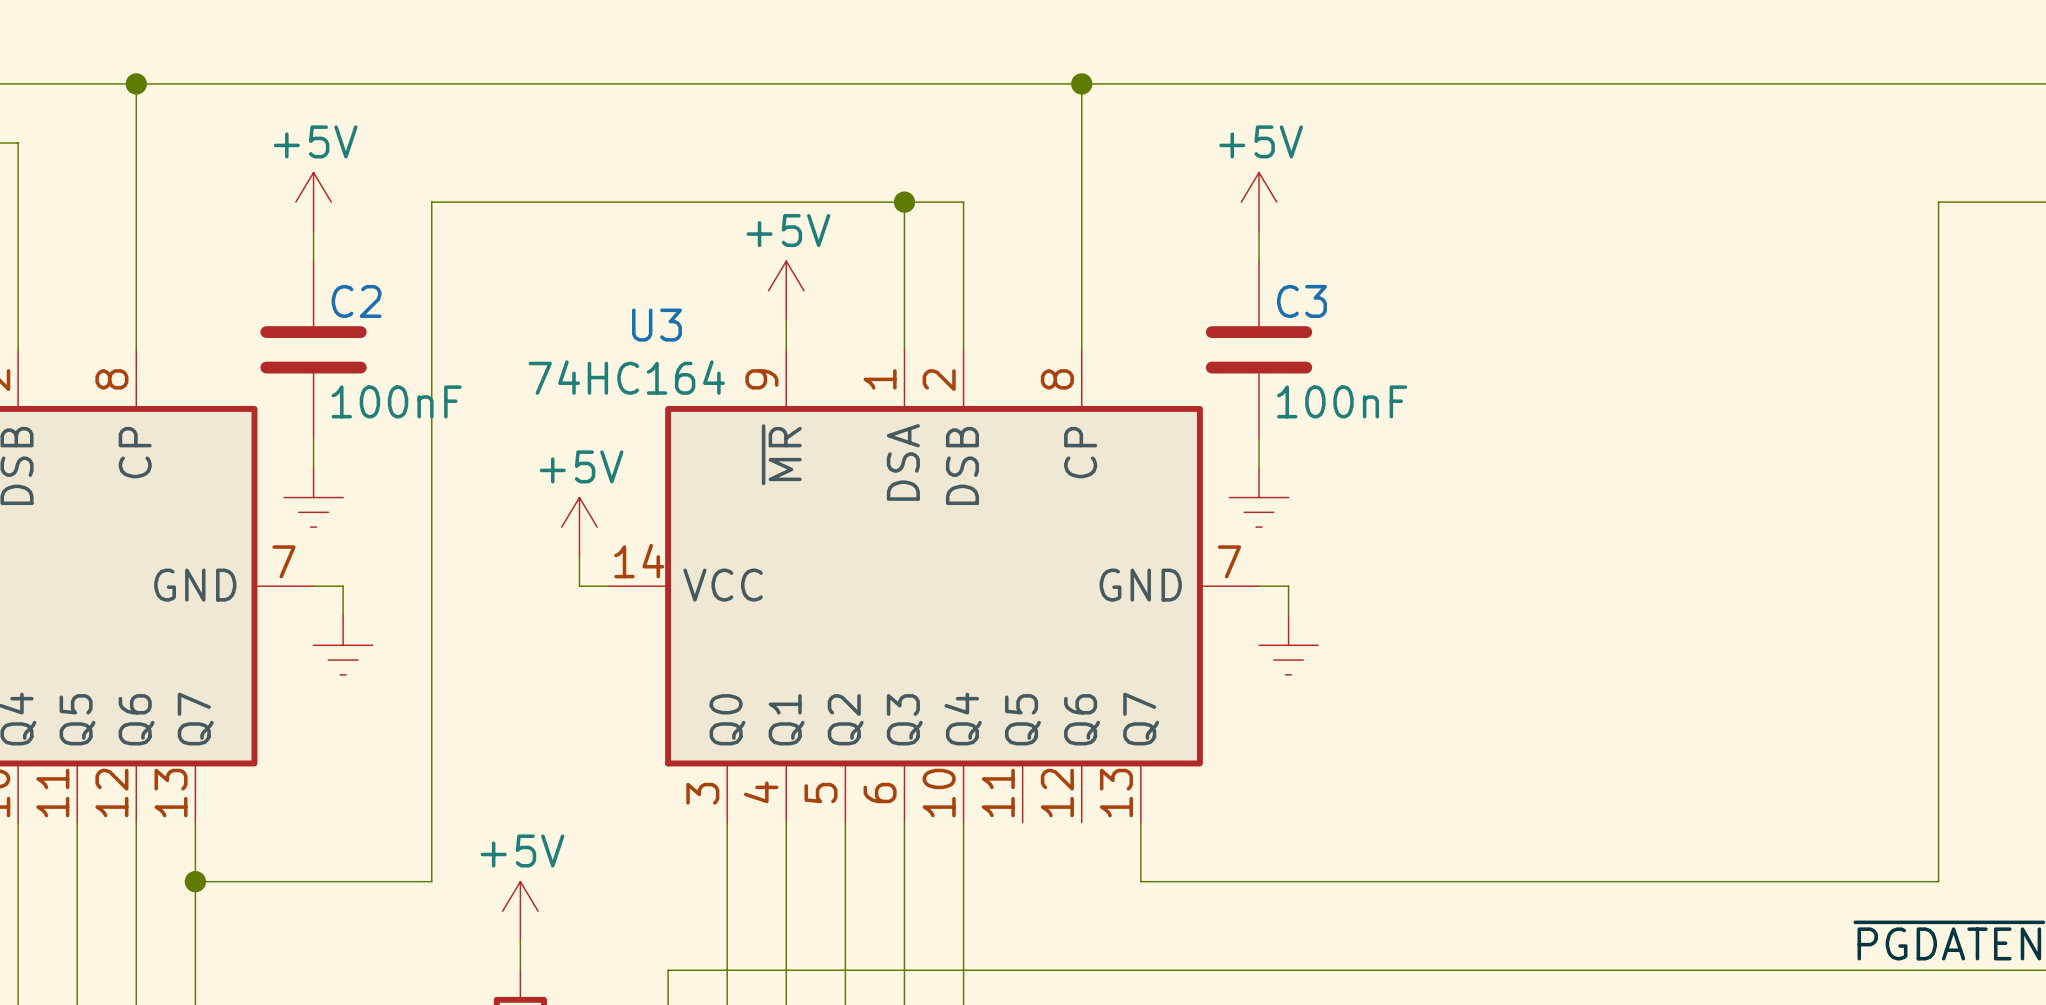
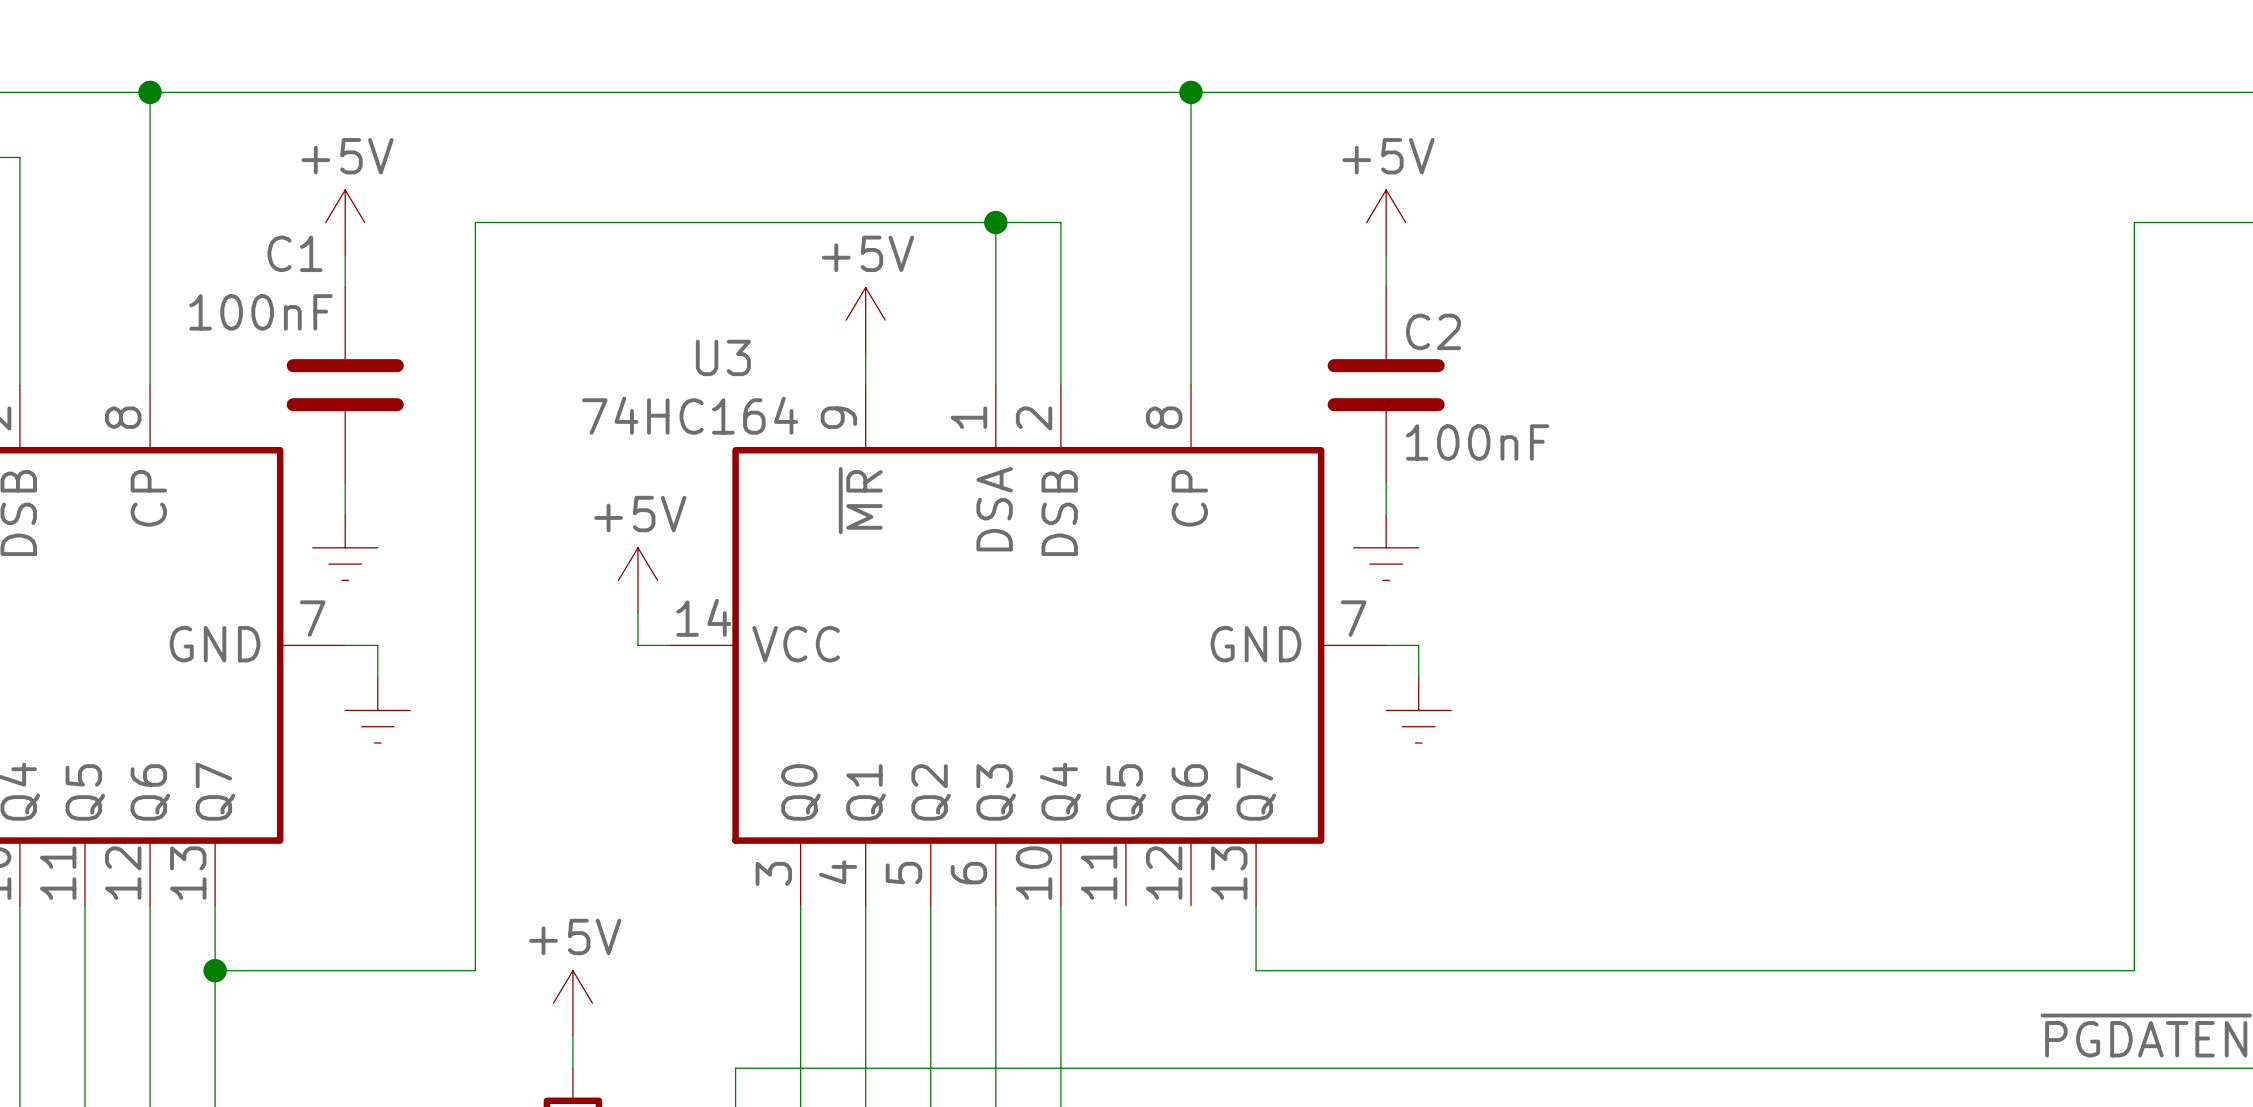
C2 name: C2 (356, 301) -> C1 (294, 253)
C3 name: C3 (1302, 301) -> C2 (1433, 331)
C2 value position: 100nF (396, 401) -> 100nF (261, 312)

